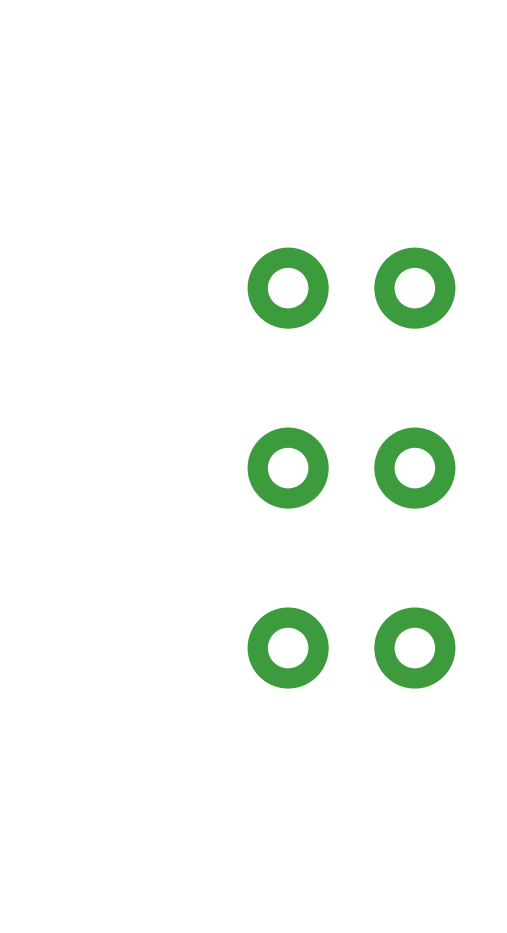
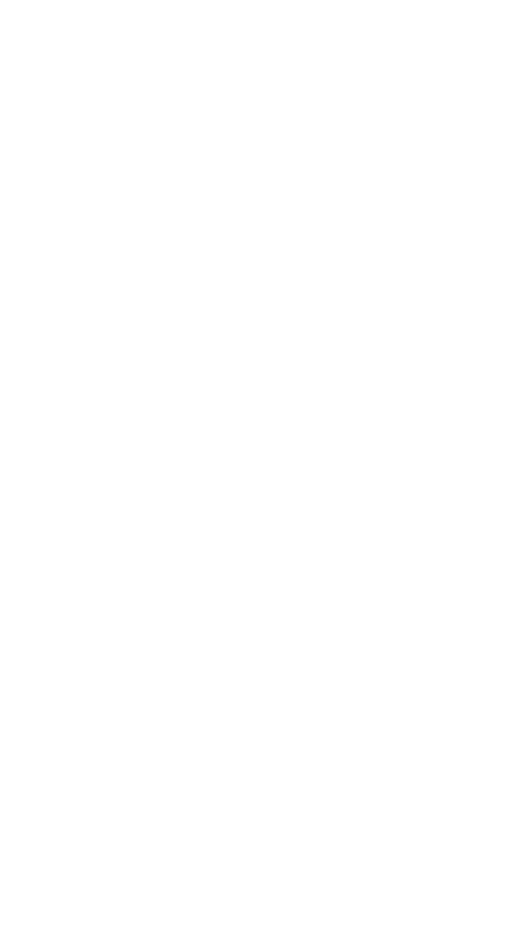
part: (351, 288) -> none
part: (351, 468) -> none
part: (351, 648) -> none

